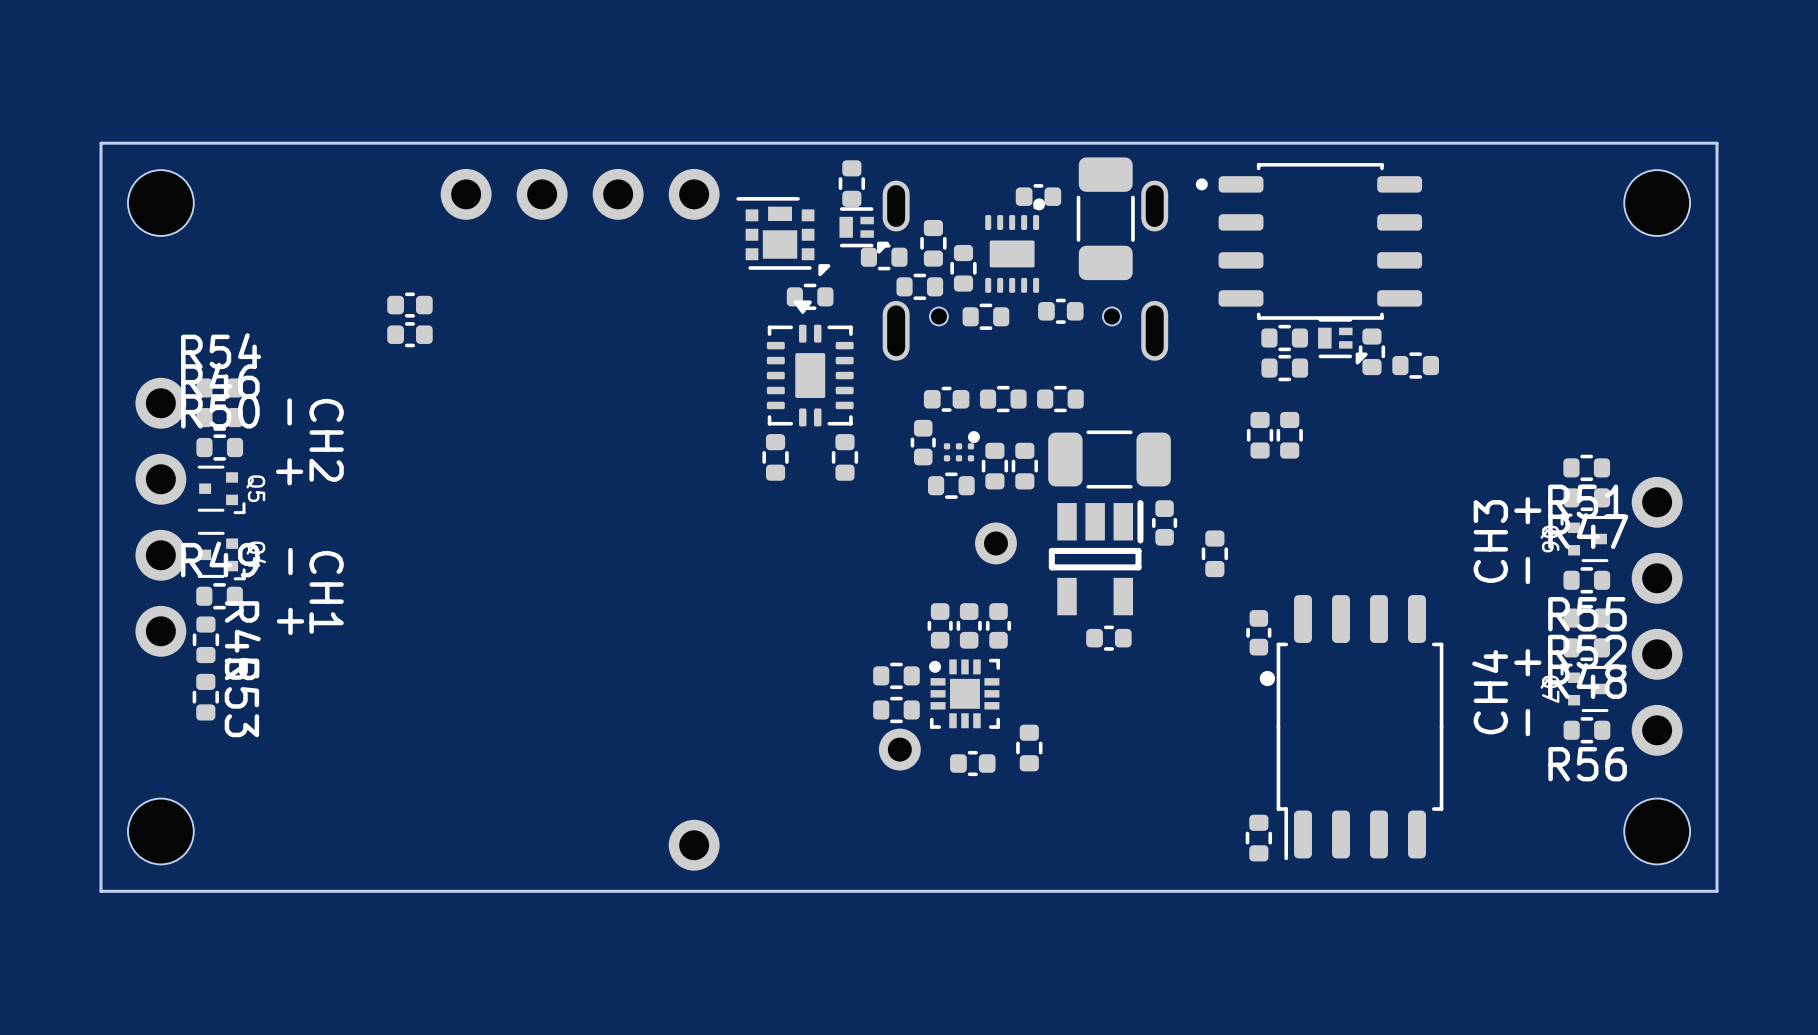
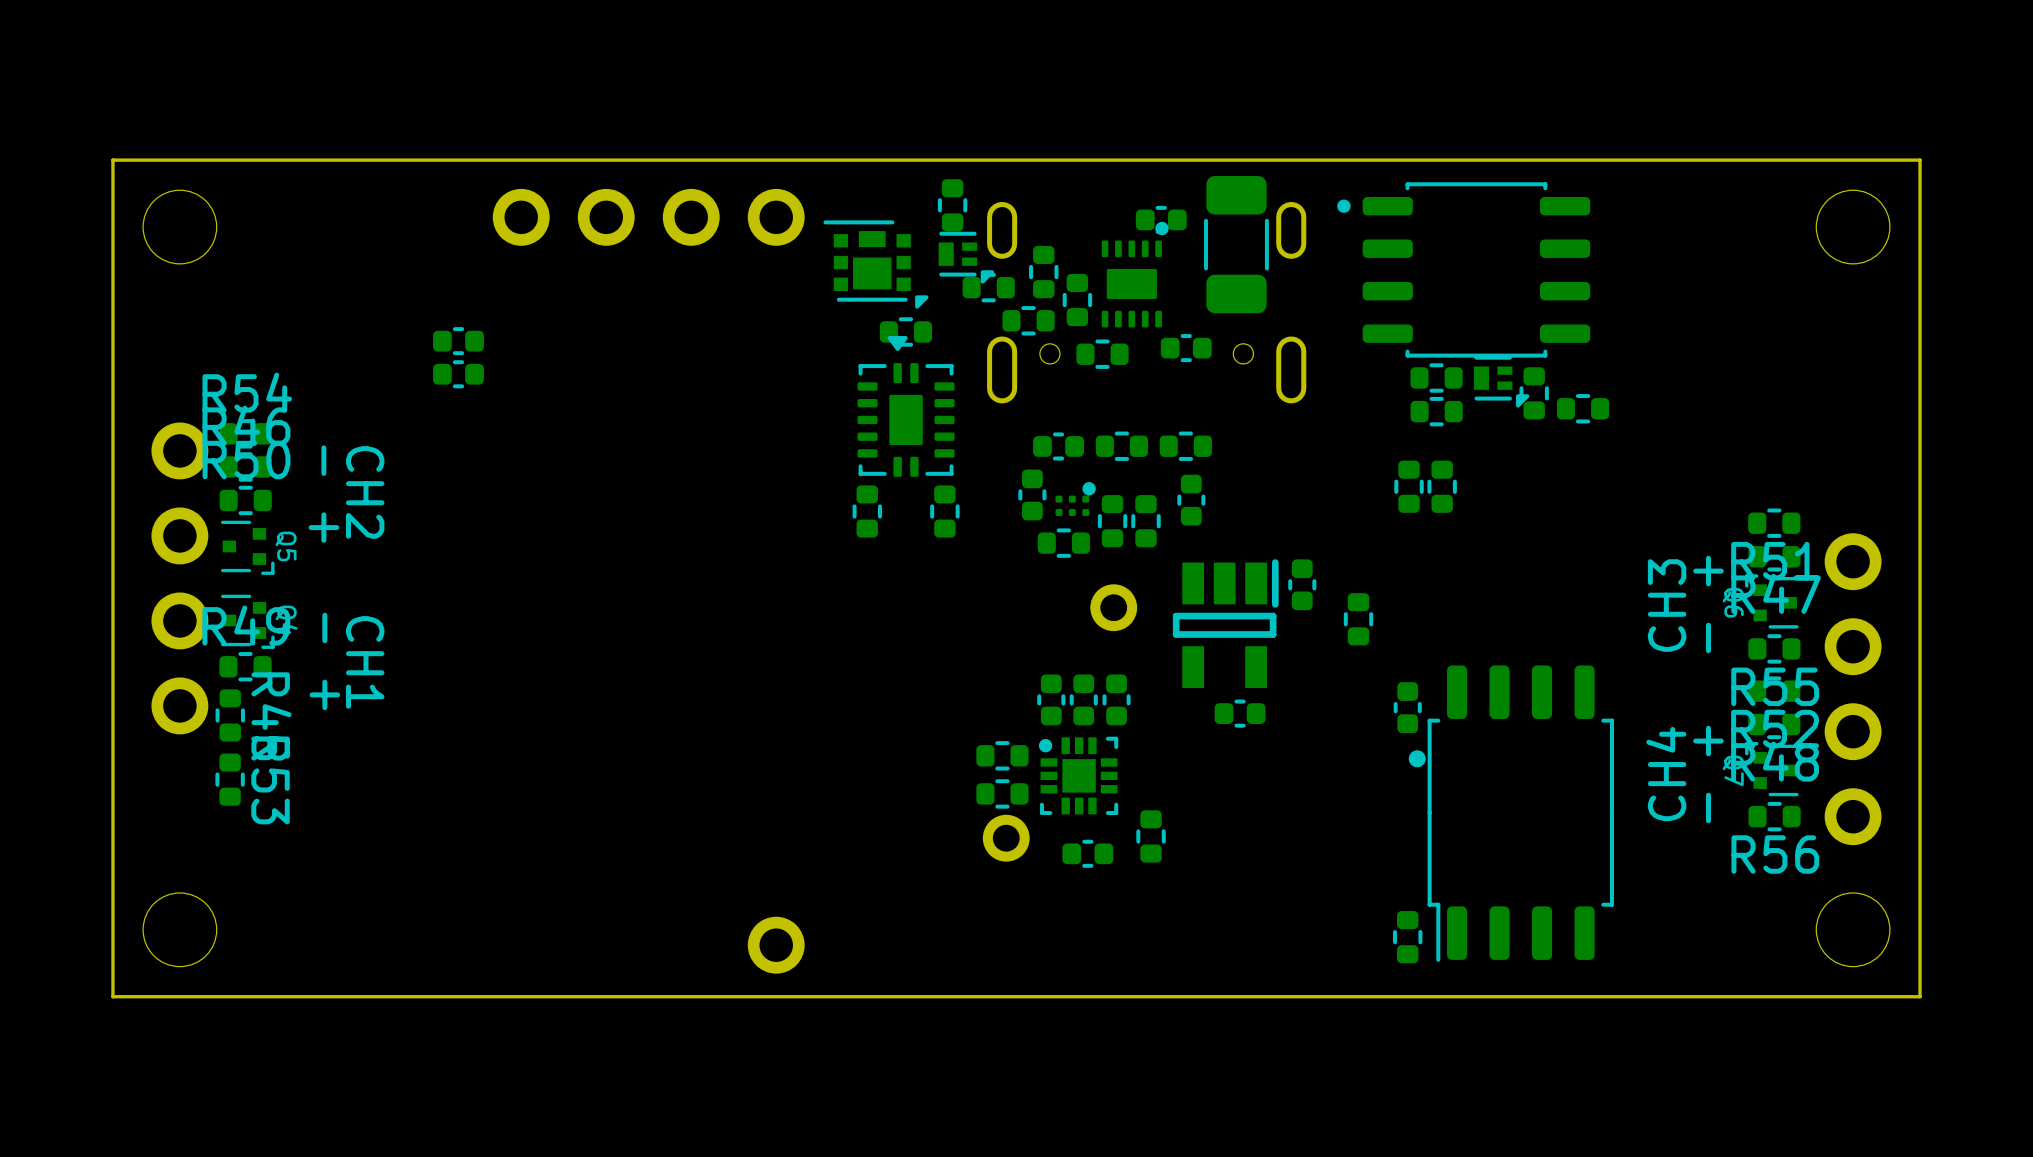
part: none -> (1191, 500)
part: (1109, 459) -> none

